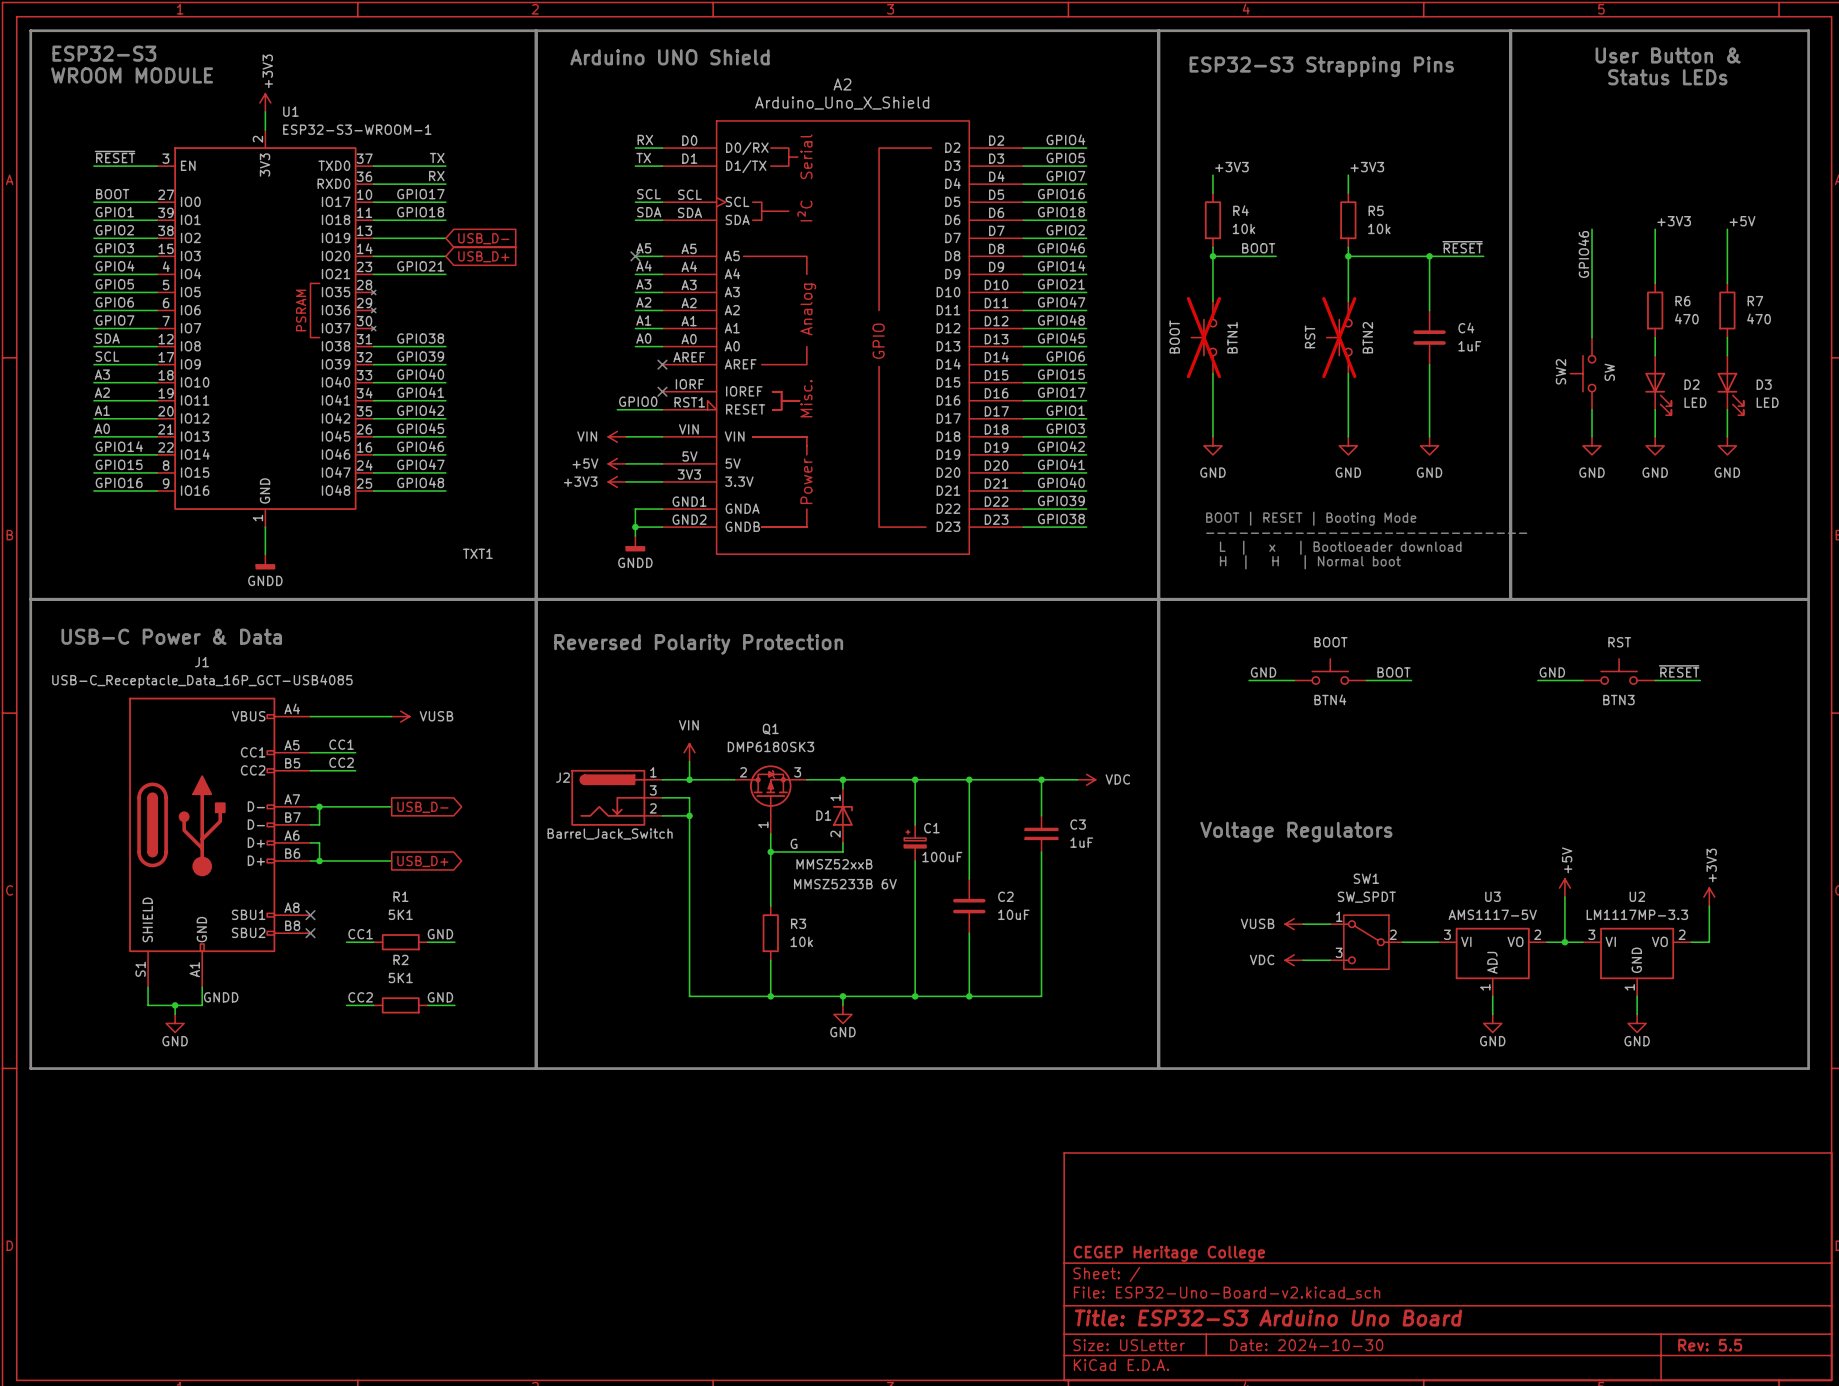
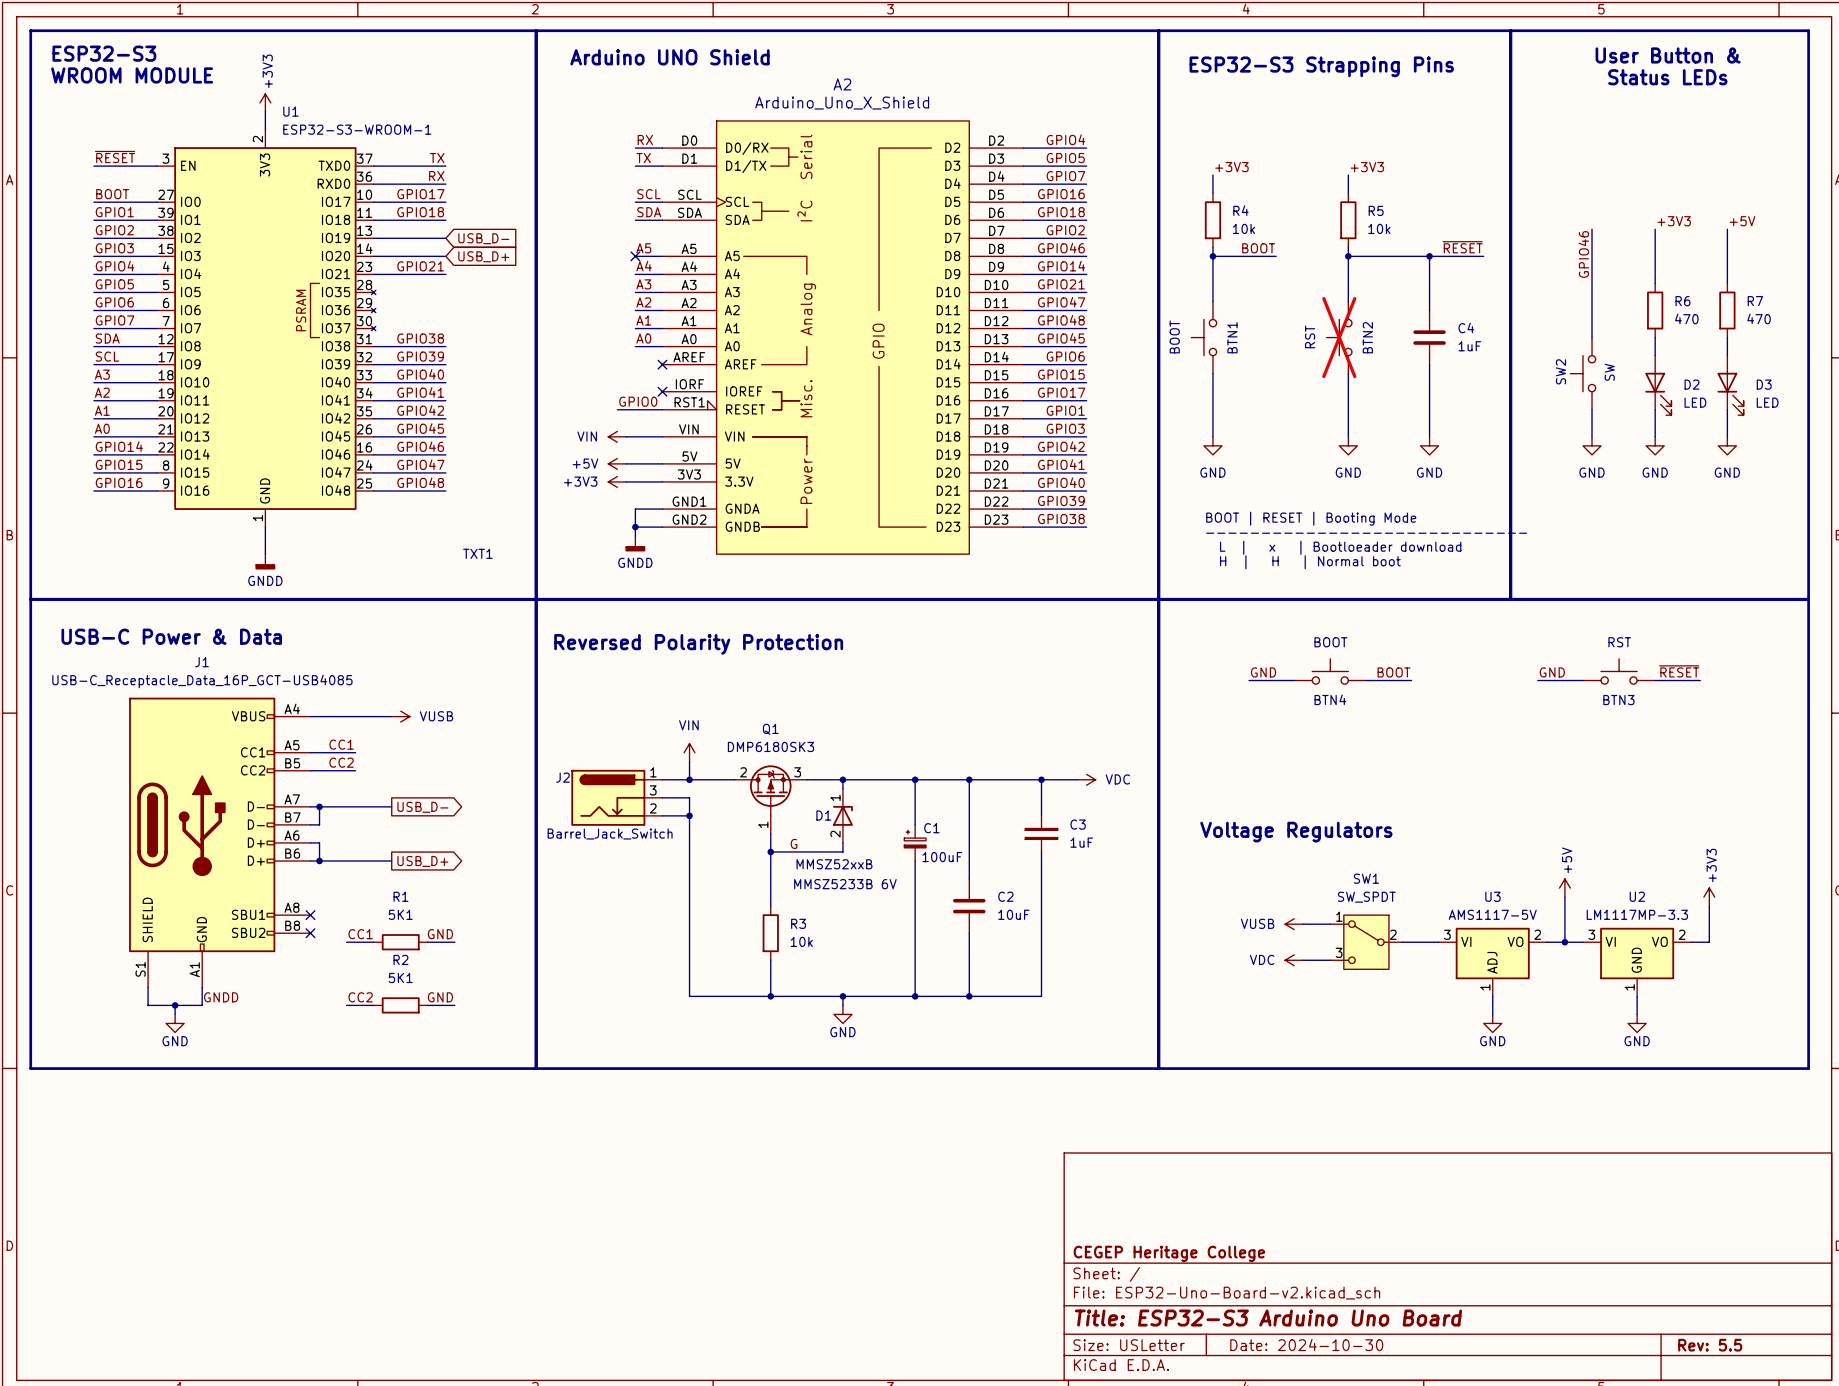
BTN1 do-not-place cross: (1203, 337) -> none

